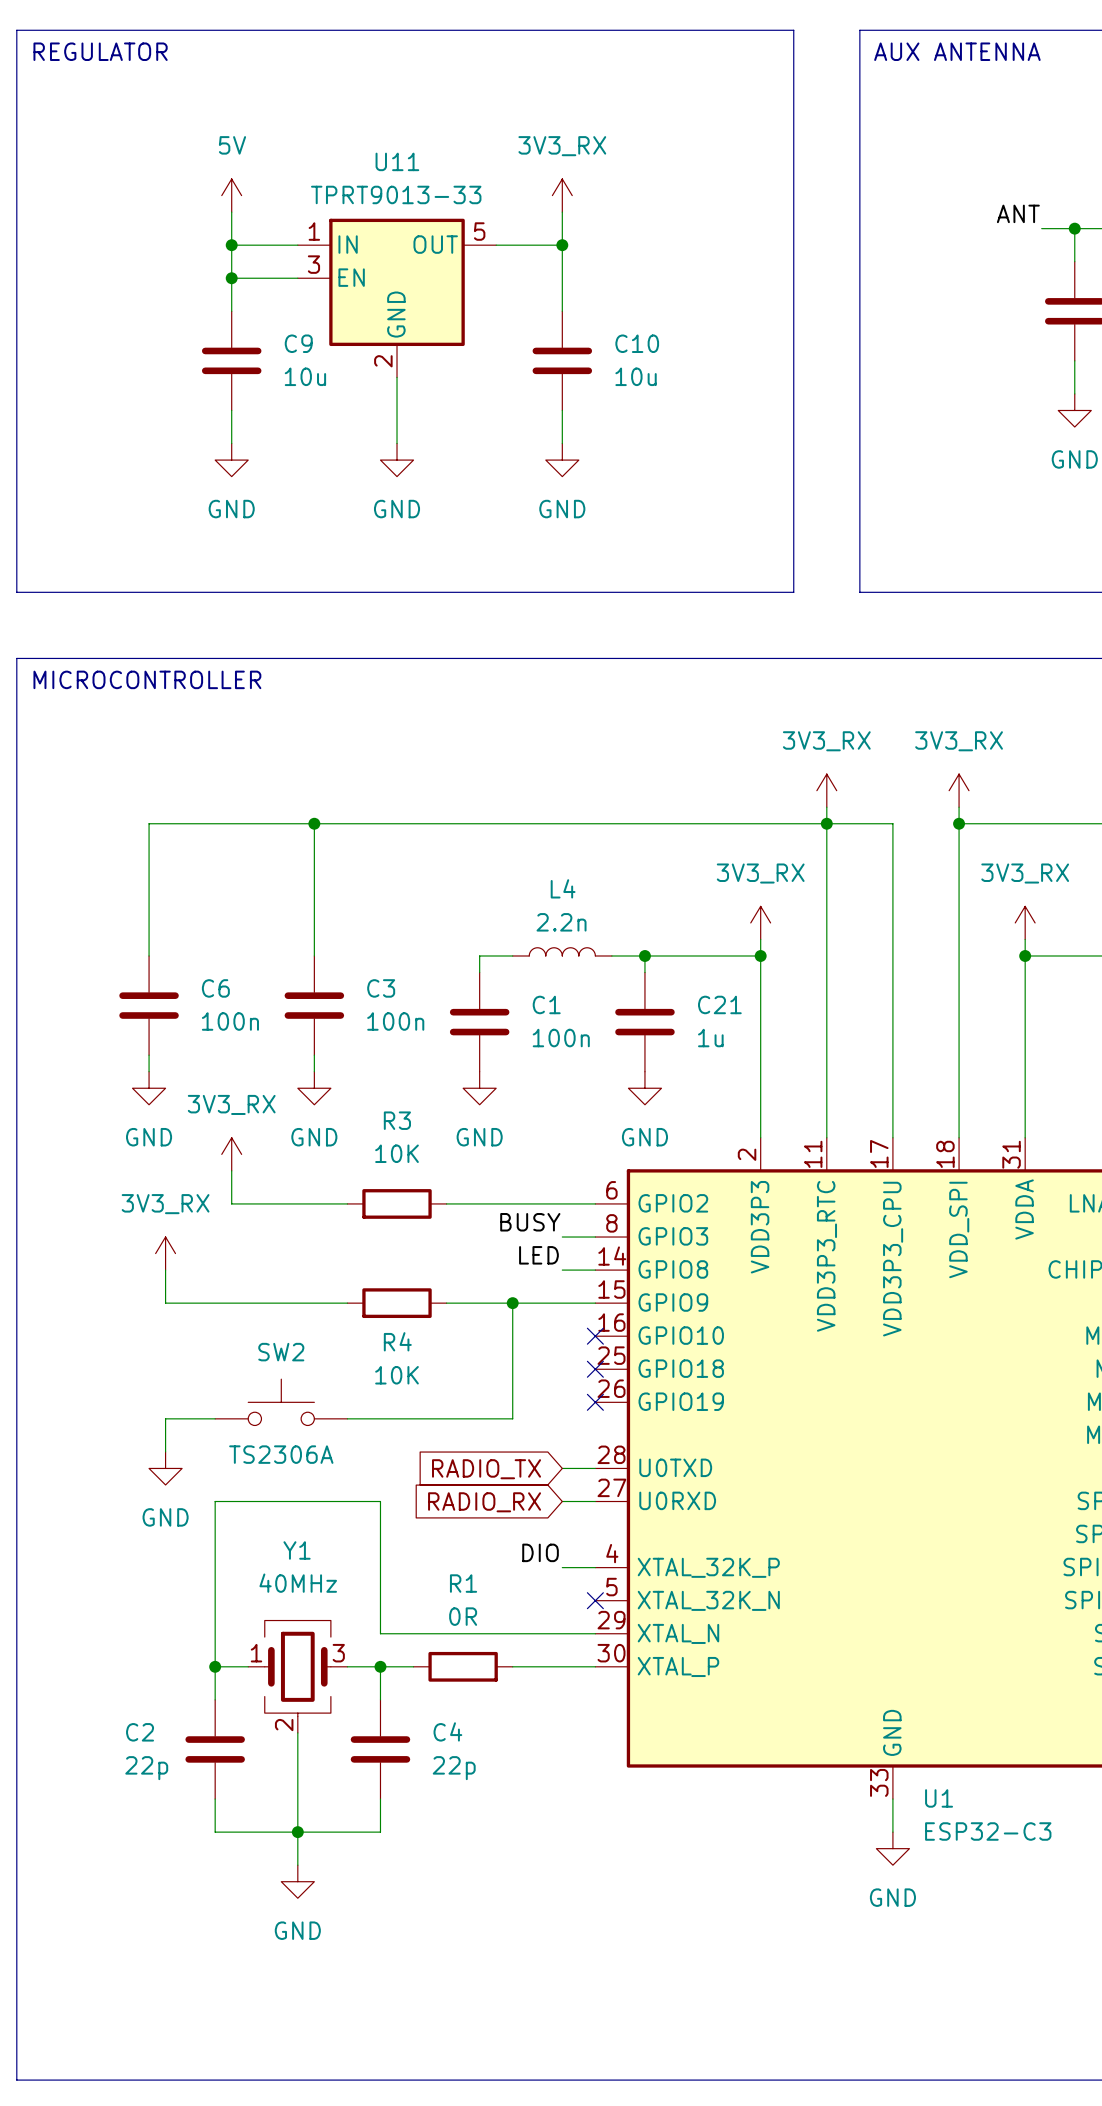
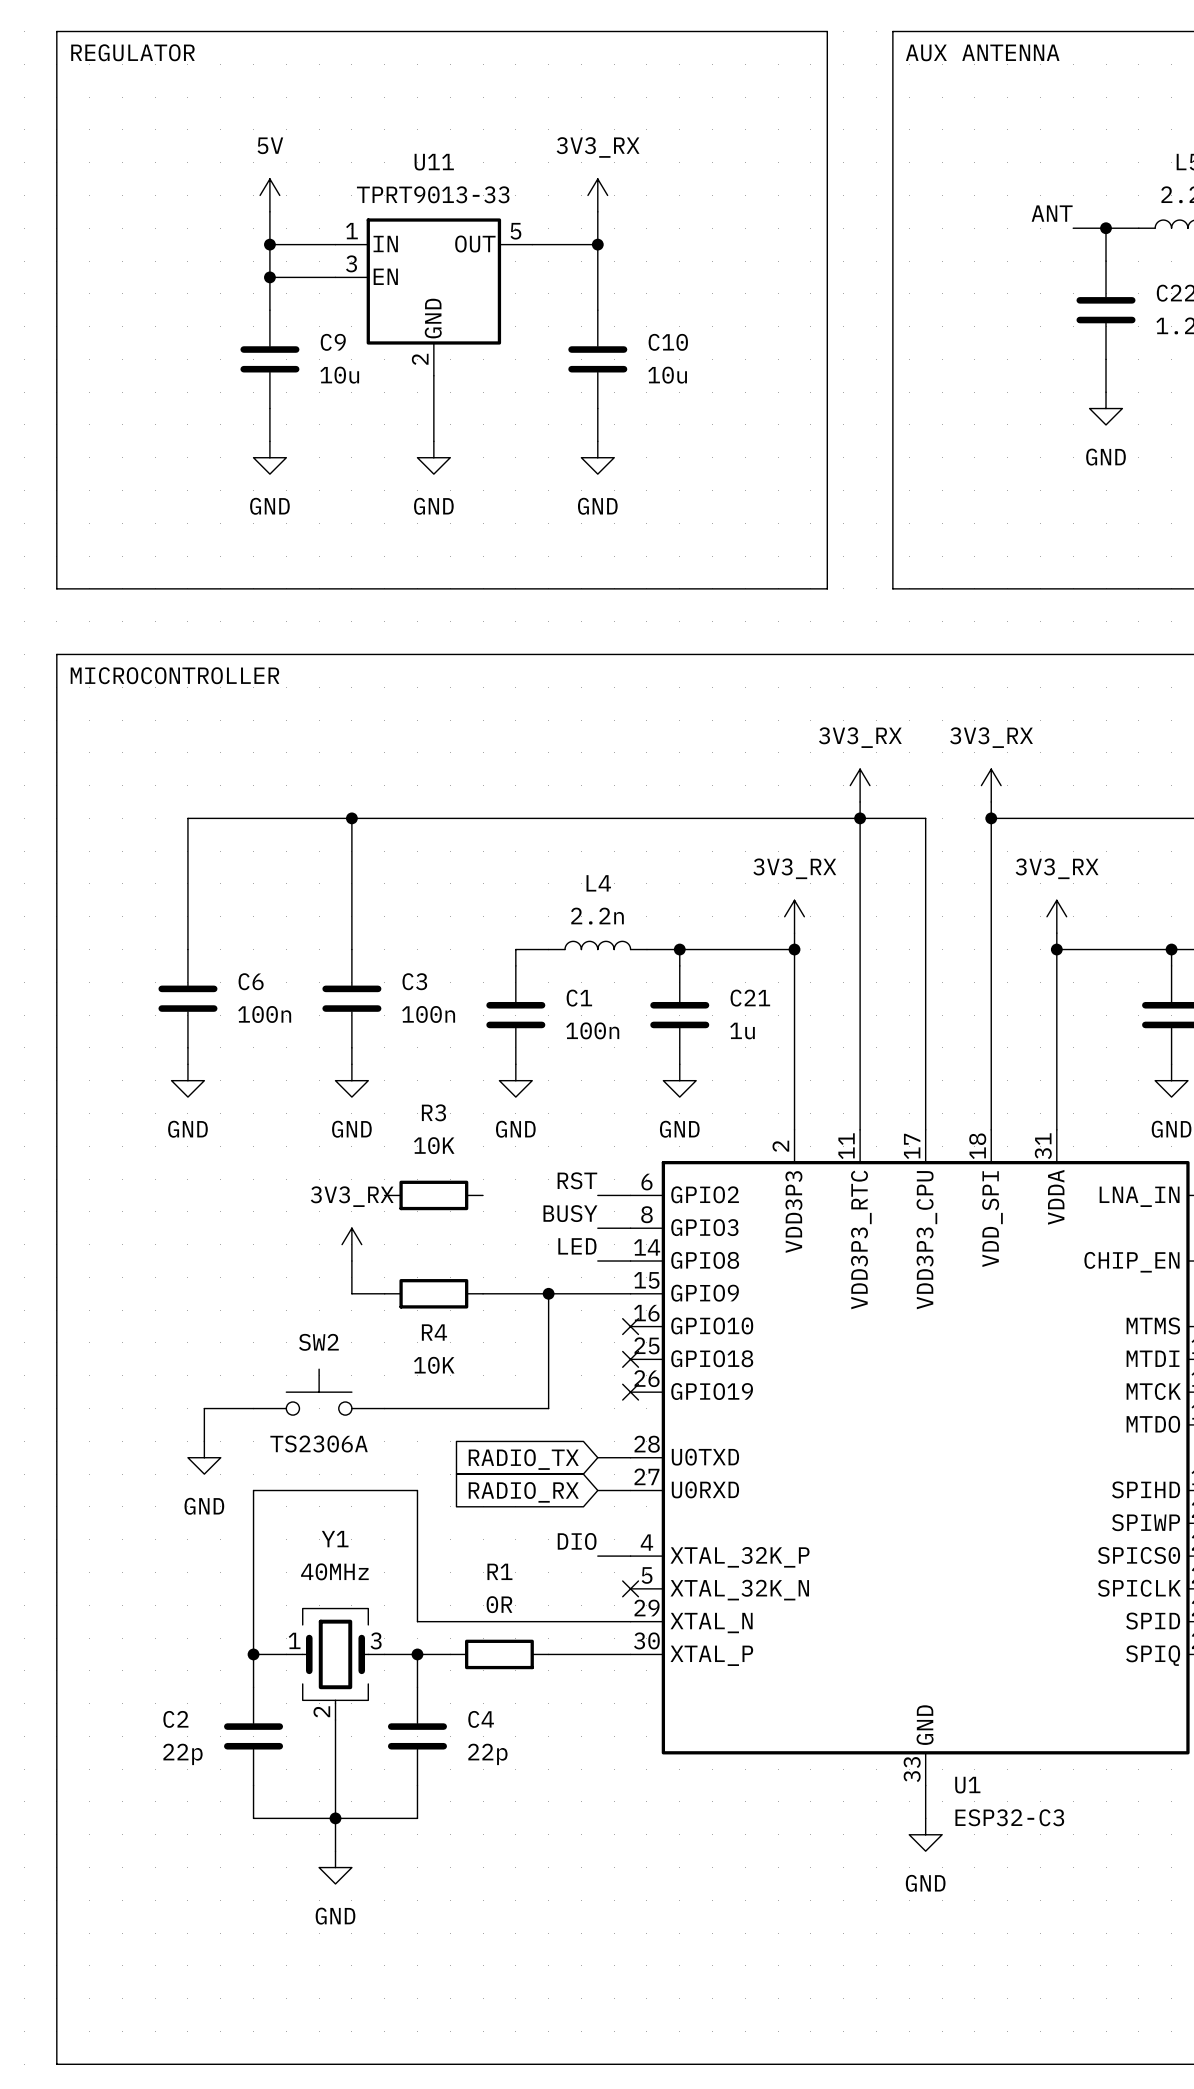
power symbol: 3V3_RX (231, 1154) -> none
wire: (231, 1170) (231, 1203) (347, 1203) -> none
label: none -> RST (577, 1180)
wire: (446, 1203) (562, 1203) -> none
power symbol: 3V3_RX (165, 1253) -> none
power symbol: none -> 3V3_RX (351, 1244)
wire: (165, 1270) (165, 1303) (314, 1303) -> (351, 1261) (351, 1293)

